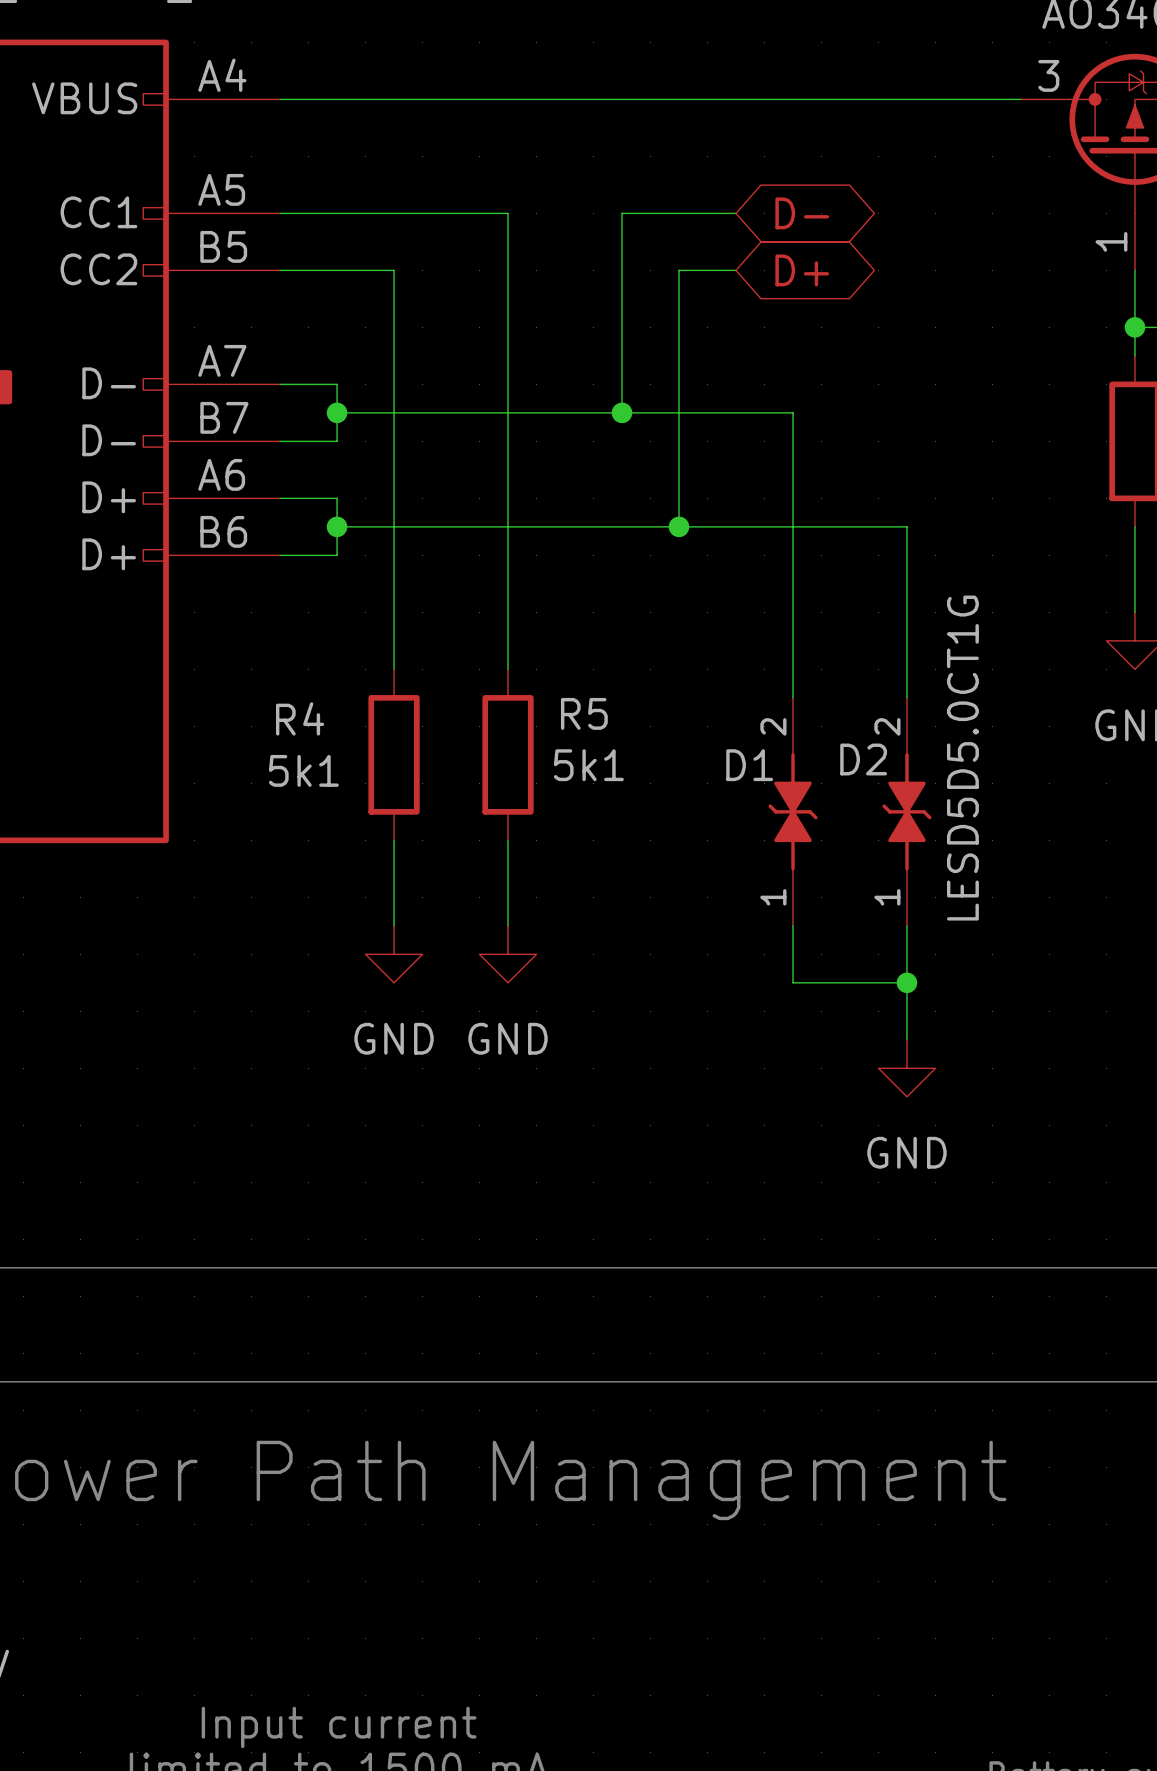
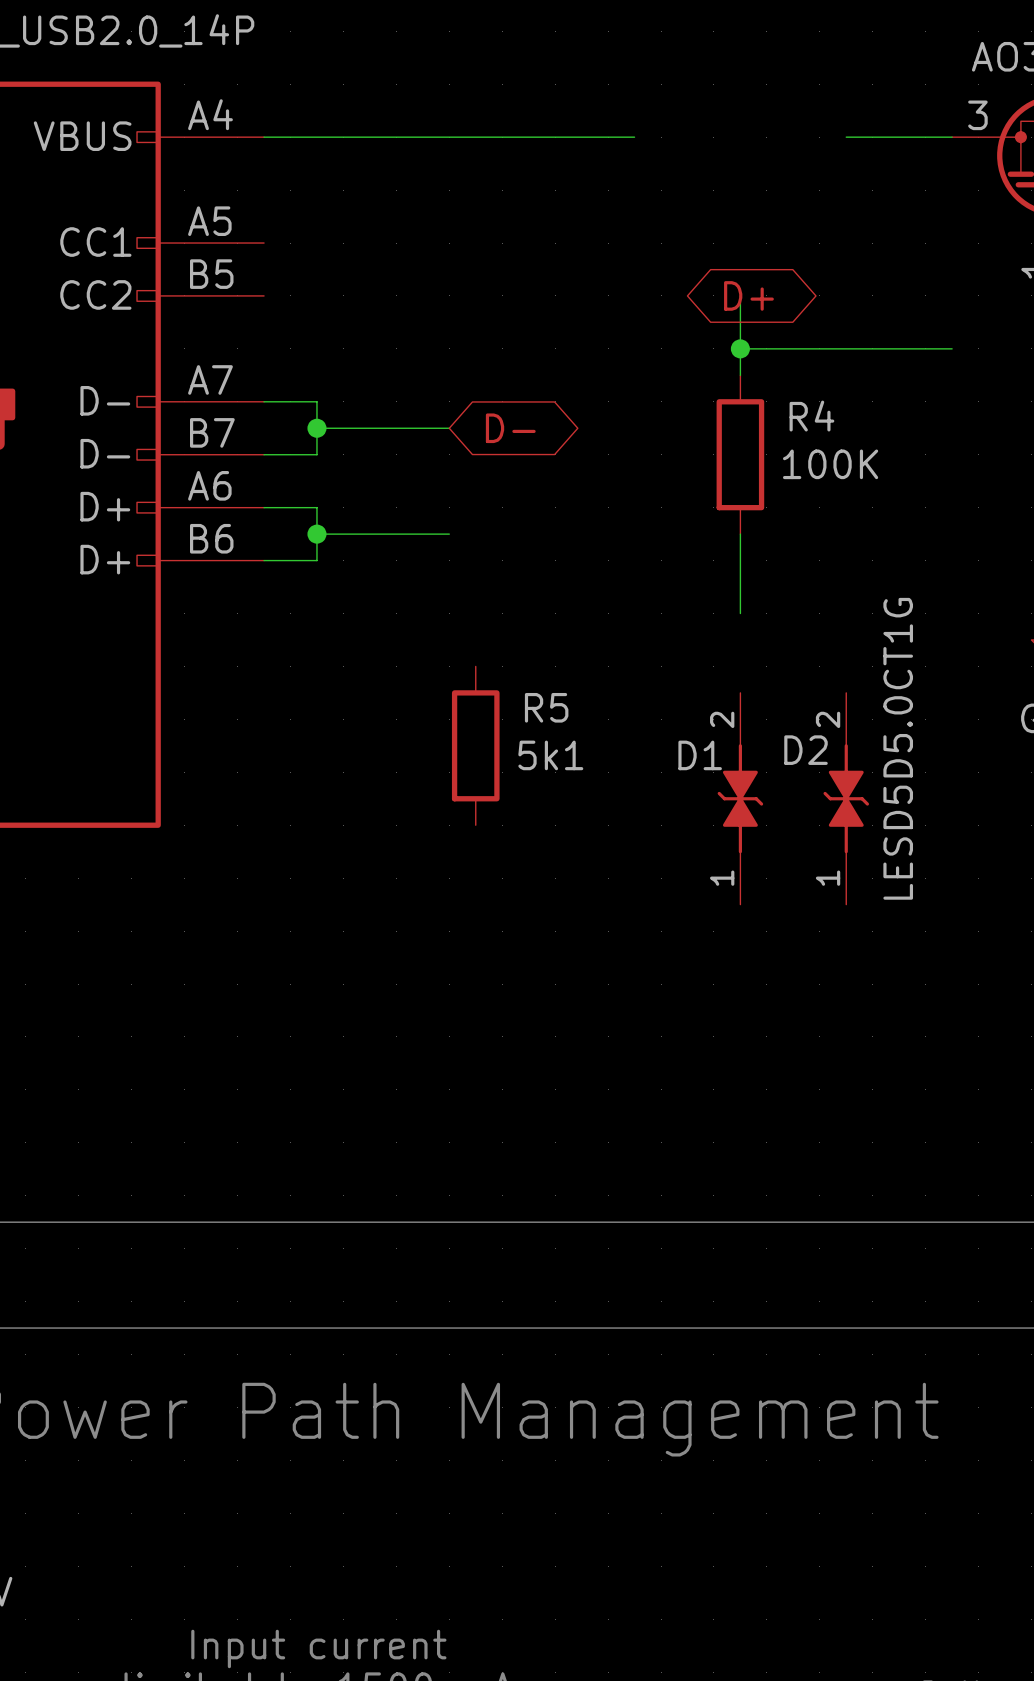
wire: (679, 99) (907, 99) -> (740, 348) (952, 348)
wire: (280, 213) (508, 213) (508, 669) -> none
wire: (736, 213) (622, 213) (622, 412) -> none
global label position: D- (802, 213) -> D- (510, 428)
wire: (280, 270) (394, 270) (394, 669) -> none
wire: (736, 270) (679, 270) (679, 526) -> none
junction: none -> (740, 348)
wire: (479, 412) (793, 412) (793, 526) -> none
junction: (622, 412) -> none
wire: (479, 526) (907, 526) (907, 697) -> none
junction: (679, 526) -> none
wire: (793, 612) (793, 697) -> (740, 295) (740, 375)
R4 name position: R4 (300, 718) -> R4 (811, 416)
R4 position: (394, 754) -> (740, 454)
R4 value: 5k1 (303, 770) -> 100K (830, 464)
wire: (394, 840) (394, 925) -> none
wire: (508, 840) (508, 925) -> none
wire: (793, 925) (793, 982) (907, 982) -> none
wire: (907, 925) (907, 1039) -> none
power symbol: GND (394, 954) -> none
power symbol: GND (508, 954) -> none
junction: (907, 982) -> none
power symbol: GND (907, 1068) -> none

